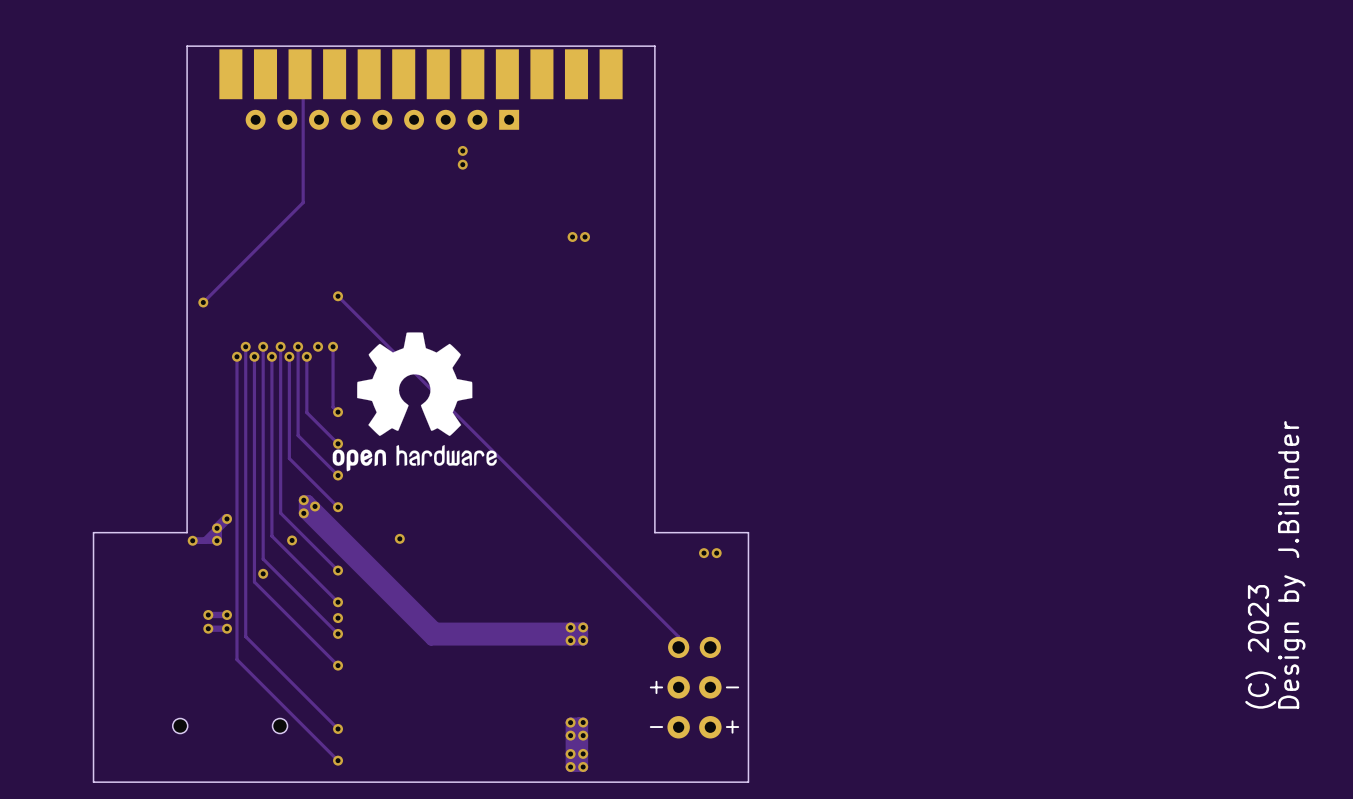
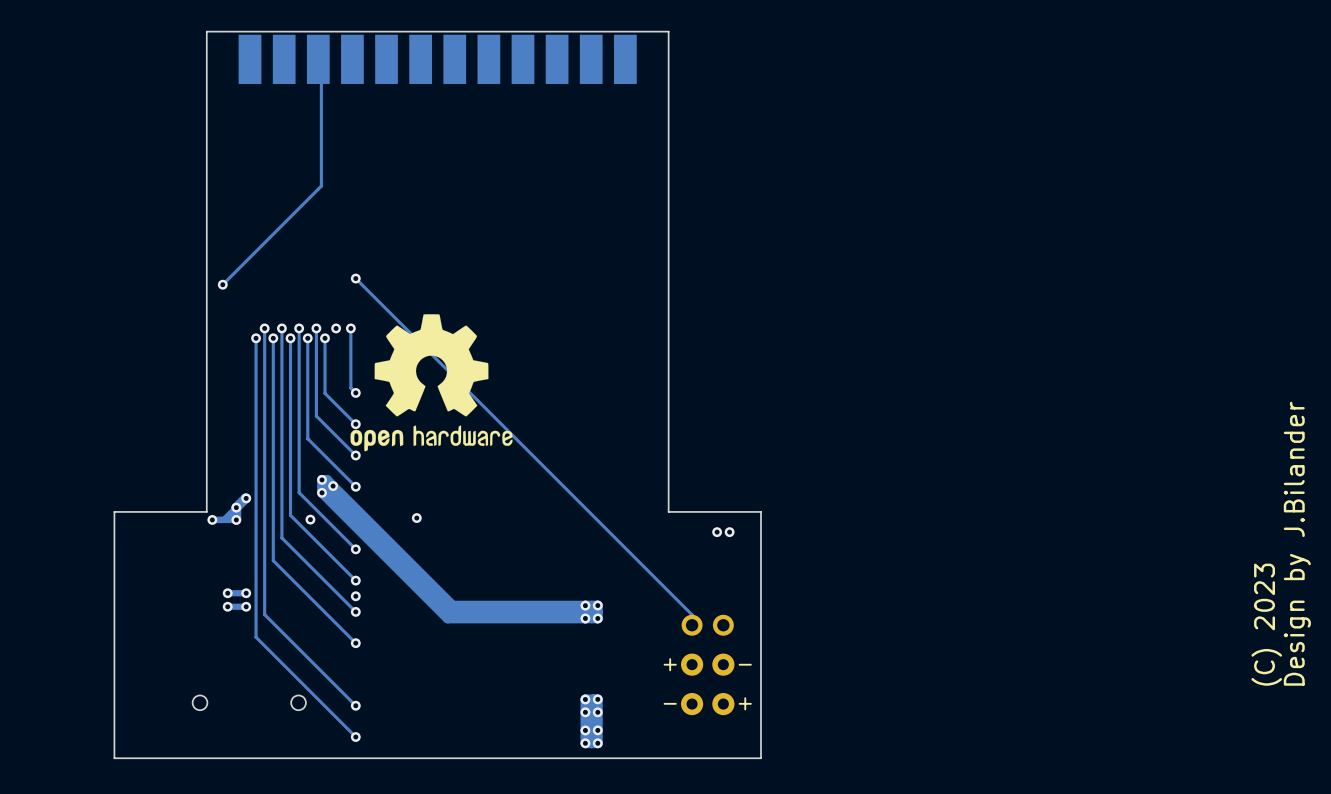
part: (382, 119) -> none
via: (462, 150) -> none
via: (462, 164) -> none
via: (572, 237) -> none
via: (585, 237) -> none
via: (263, 573) -> none

